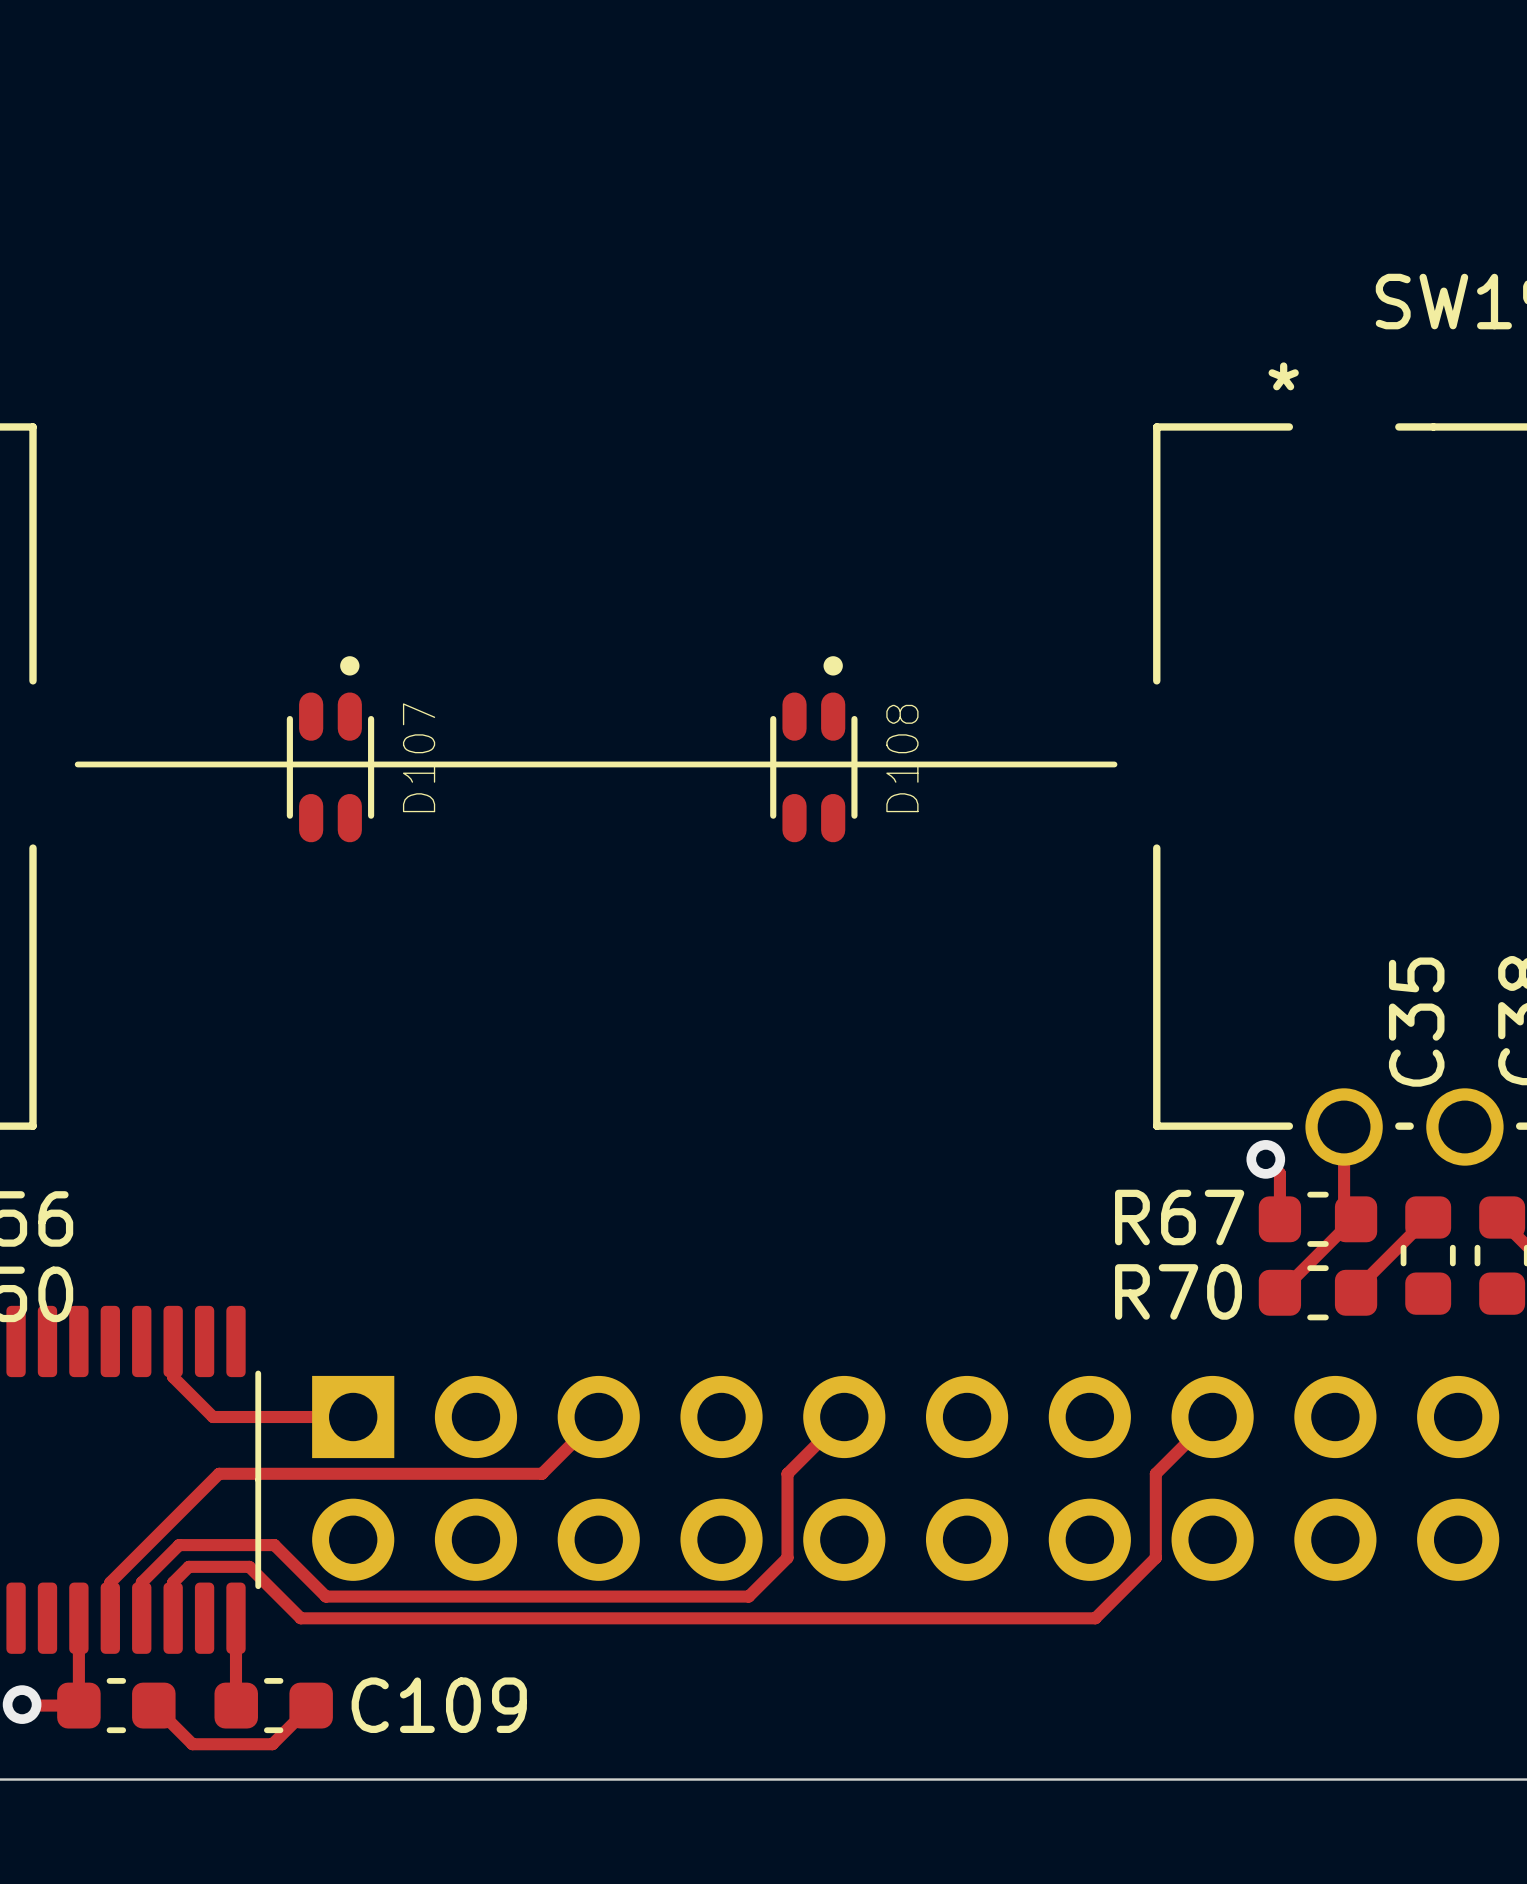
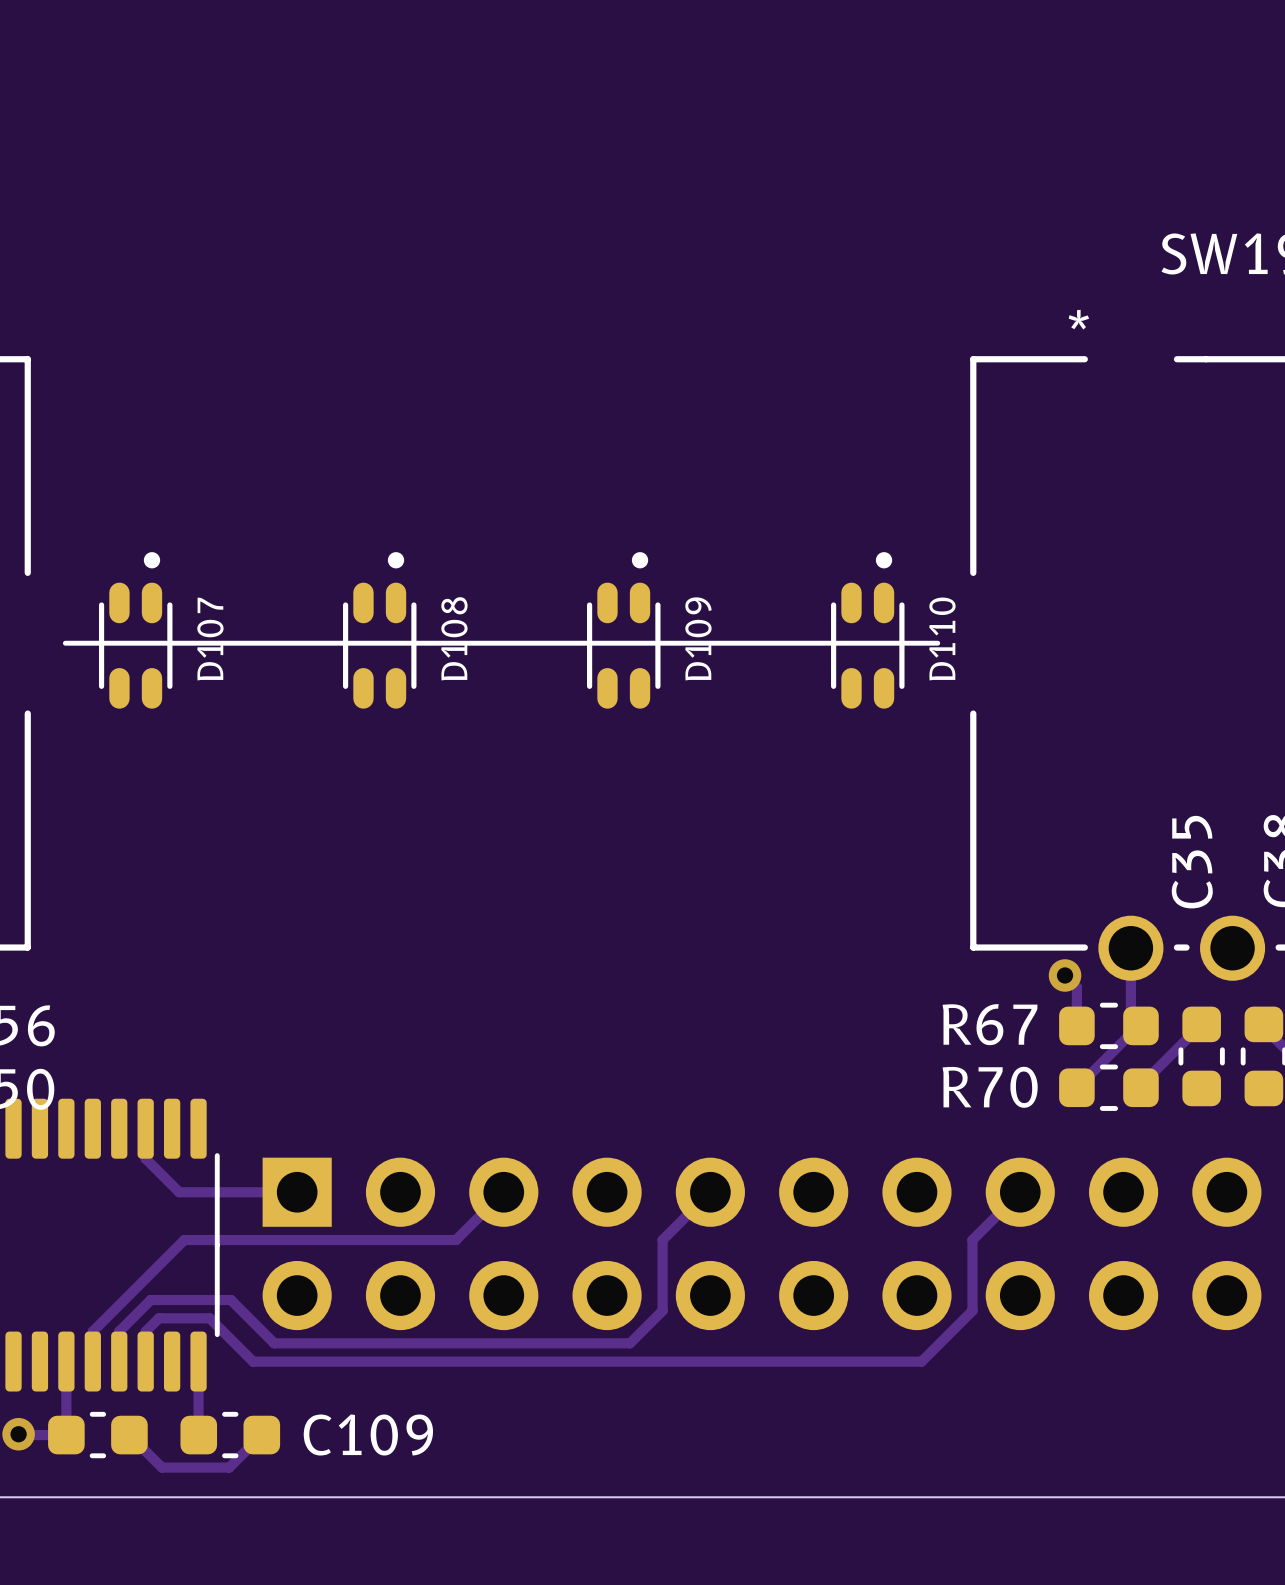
D107 position: (330, 749) -> (135, 630)
D109: none -> (623, 630)
D108 position: (813, 749) -> (379, 630)
D110: none -> (867, 630)

